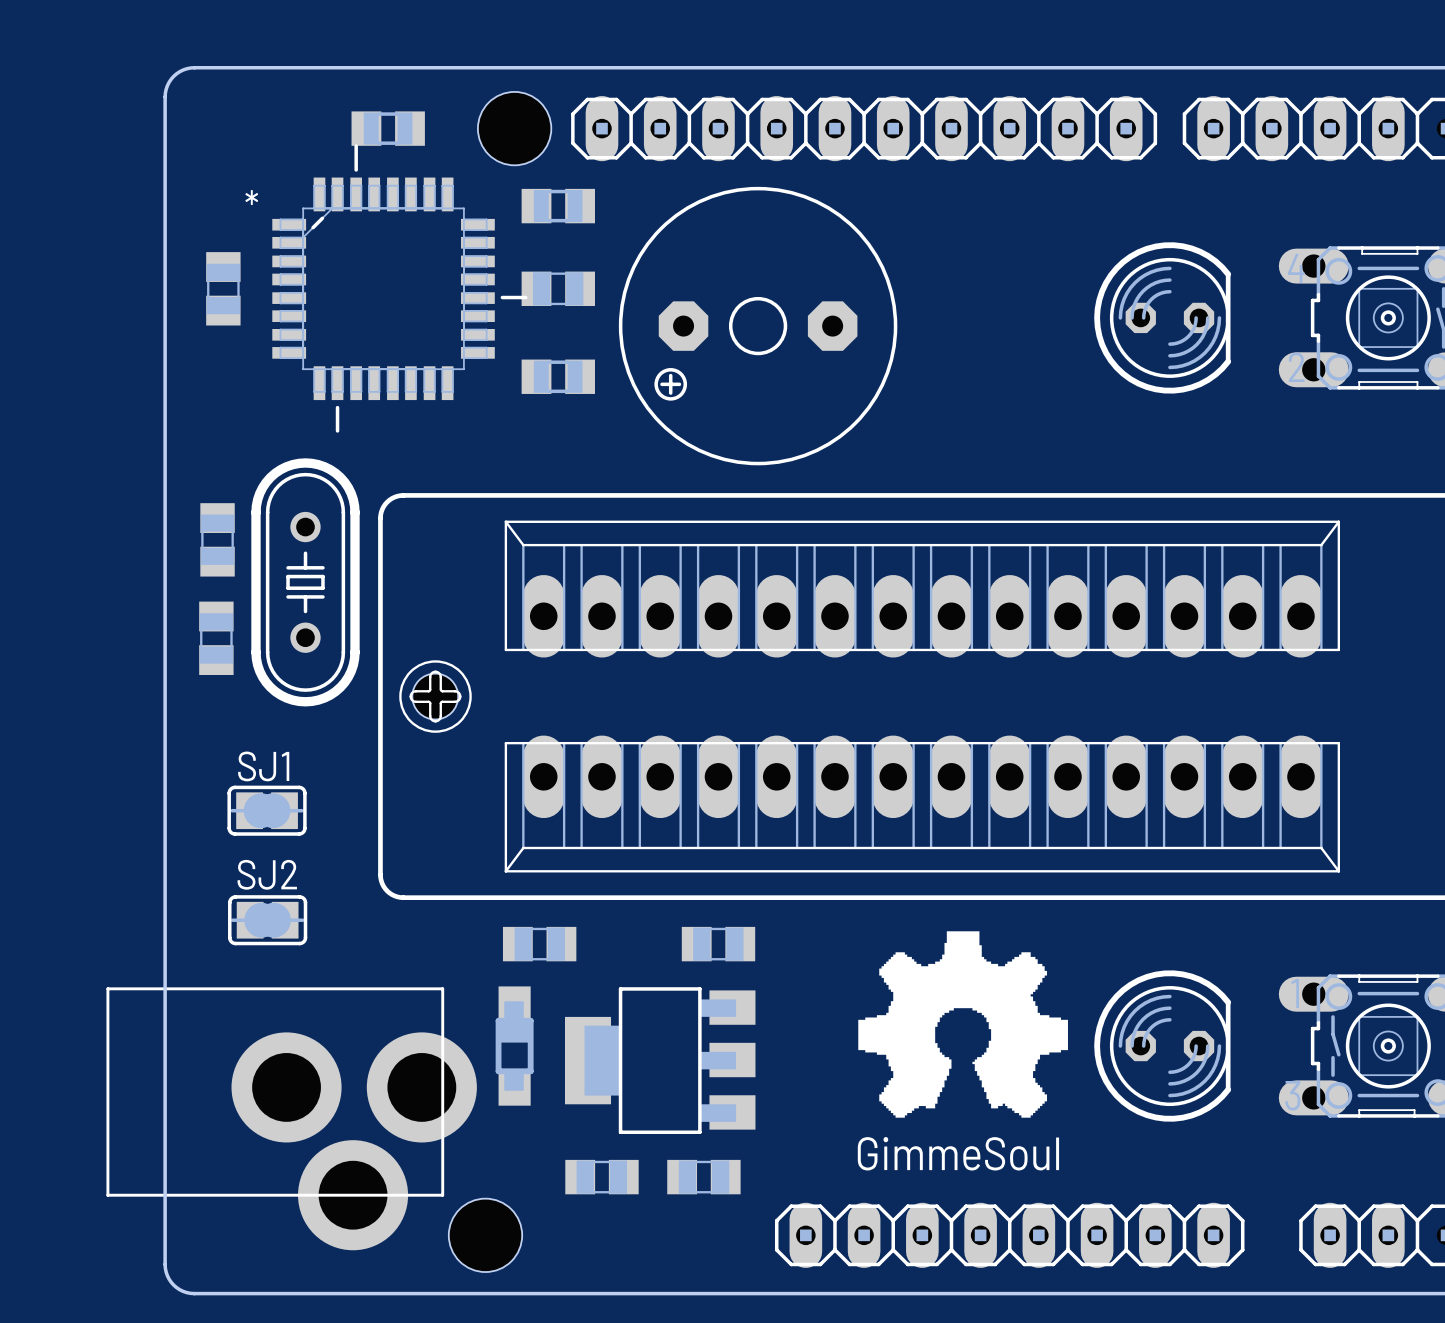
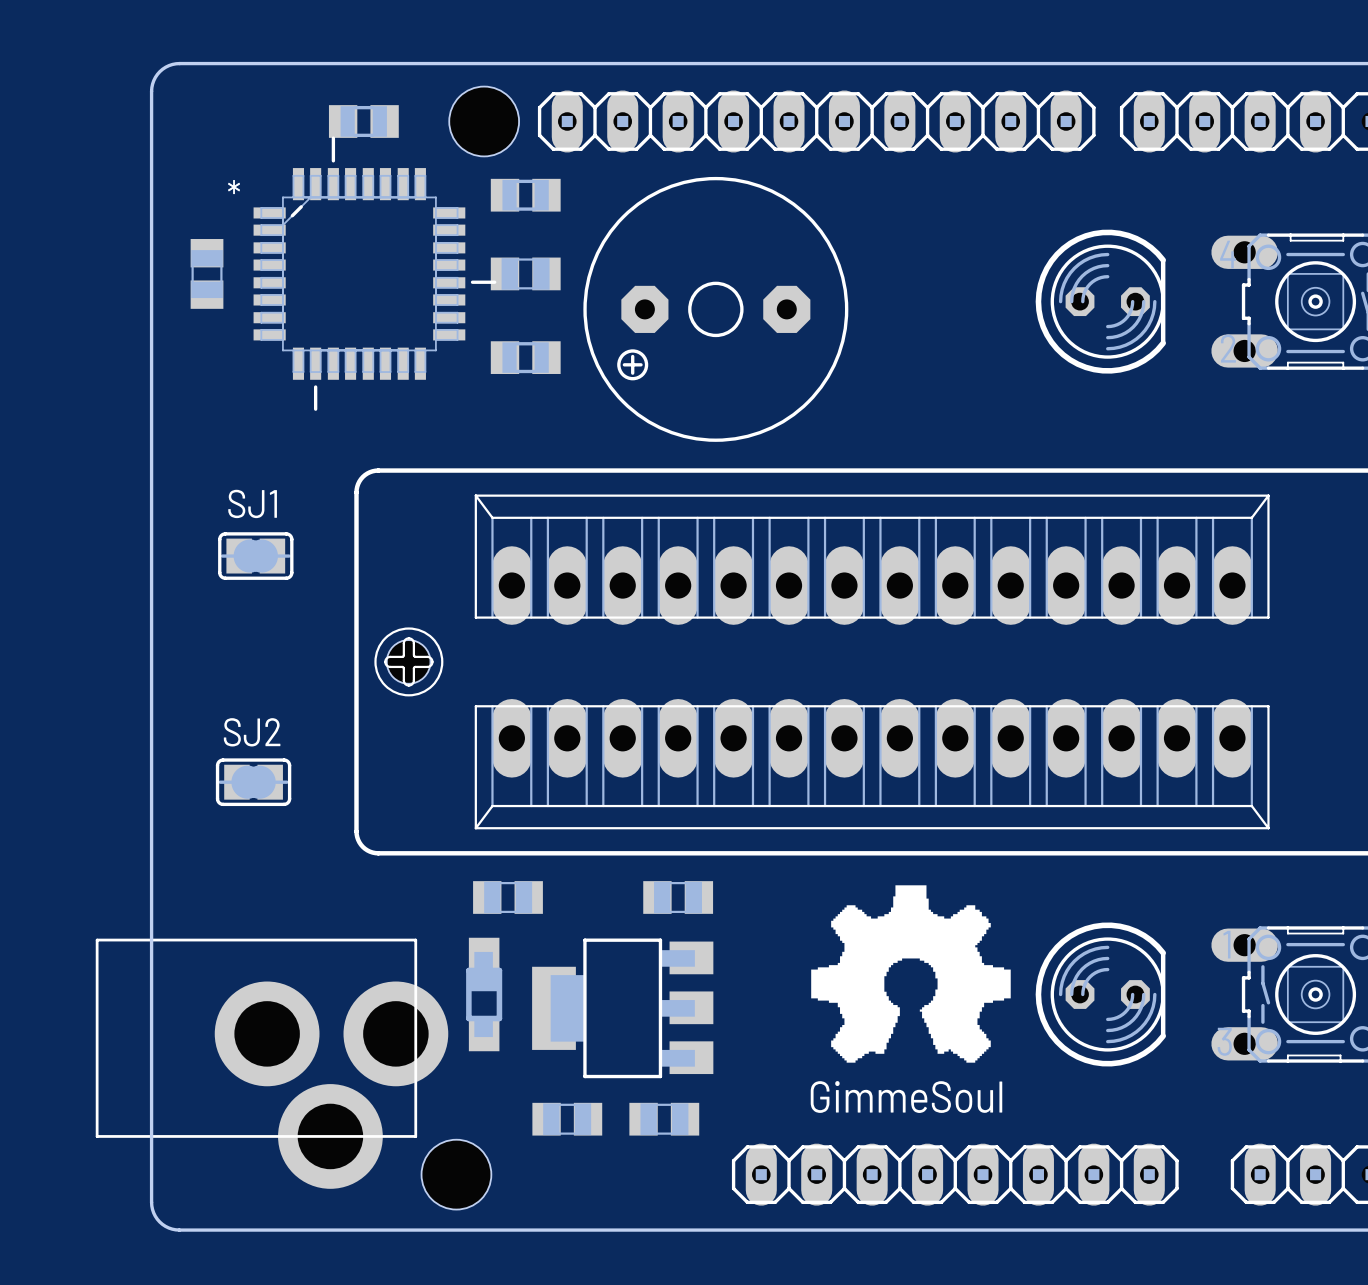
part: (217, 539) -> none
part: (305, 582) -> none
part: (216, 638) -> none
SJ1 name position: SJ1 (263, 766) -> SJ1 (252, 503)
SJ1 position: (267, 810) -> (255, 556)
SJ2 name position: SJ2 (267, 874) -> SJ2 (252, 732)
SJ2 position: (267, 920) -> (253, 782)

